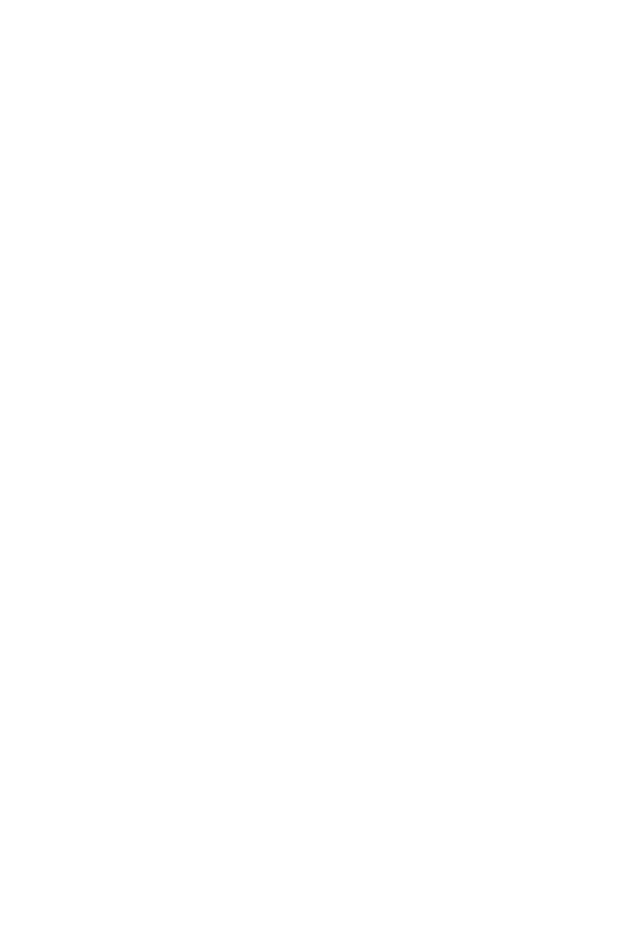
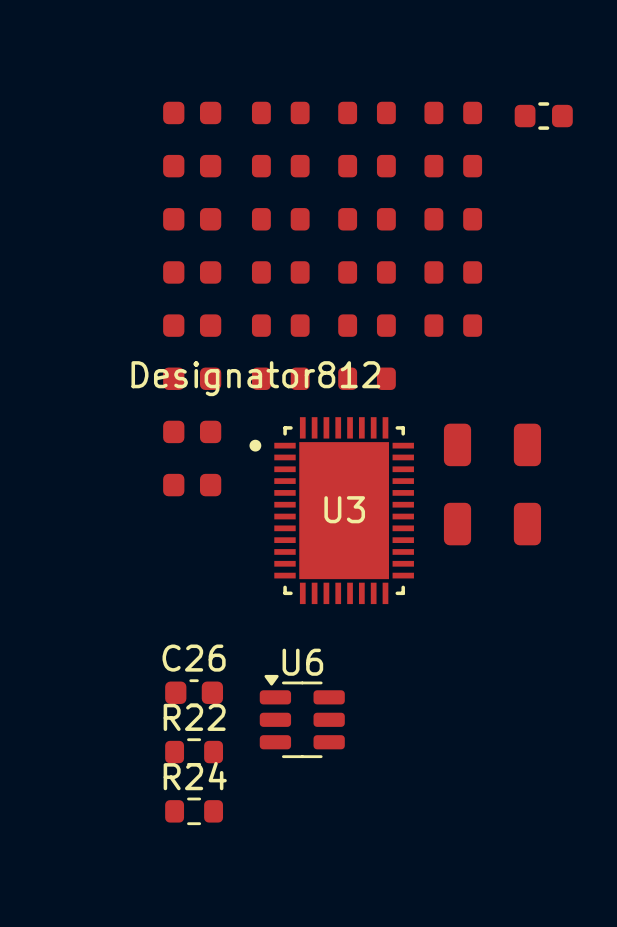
part: none -> (192, 112)
part: none -> (280, 112)
part: none -> (367, 112)
part: none -> (453, 112)
part: none -> (543, 116)
part: none -> (192, 166)
part: none -> (280, 166)
part: none -> (367, 166)
part: none -> (453, 166)
part: none -> (192, 219)
part: none -> (280, 219)
part: none -> (367, 219)
part: none -> (453, 219)
part: none -> (192, 272)
part: none -> (280, 272)
part: none -> (367, 272)
part: none -> (453, 272)
part: none -> (192, 325)
part: none -> (280, 325)
part: none -> (367, 325)
part: none -> (453, 325)
part: none -> (192, 378)
part: none -> (280, 378)
part: none -> (367, 378)
part: none -> (192, 431)
part: none -> (492, 444)
part: none -> (192, 485)
U3: none -> (331, 510)
part: none -> (492, 524)
C26: none -> (194, 692)
U6: none -> (302, 716)
R22: none -> (194, 752)
R24: none -> (194, 811)

